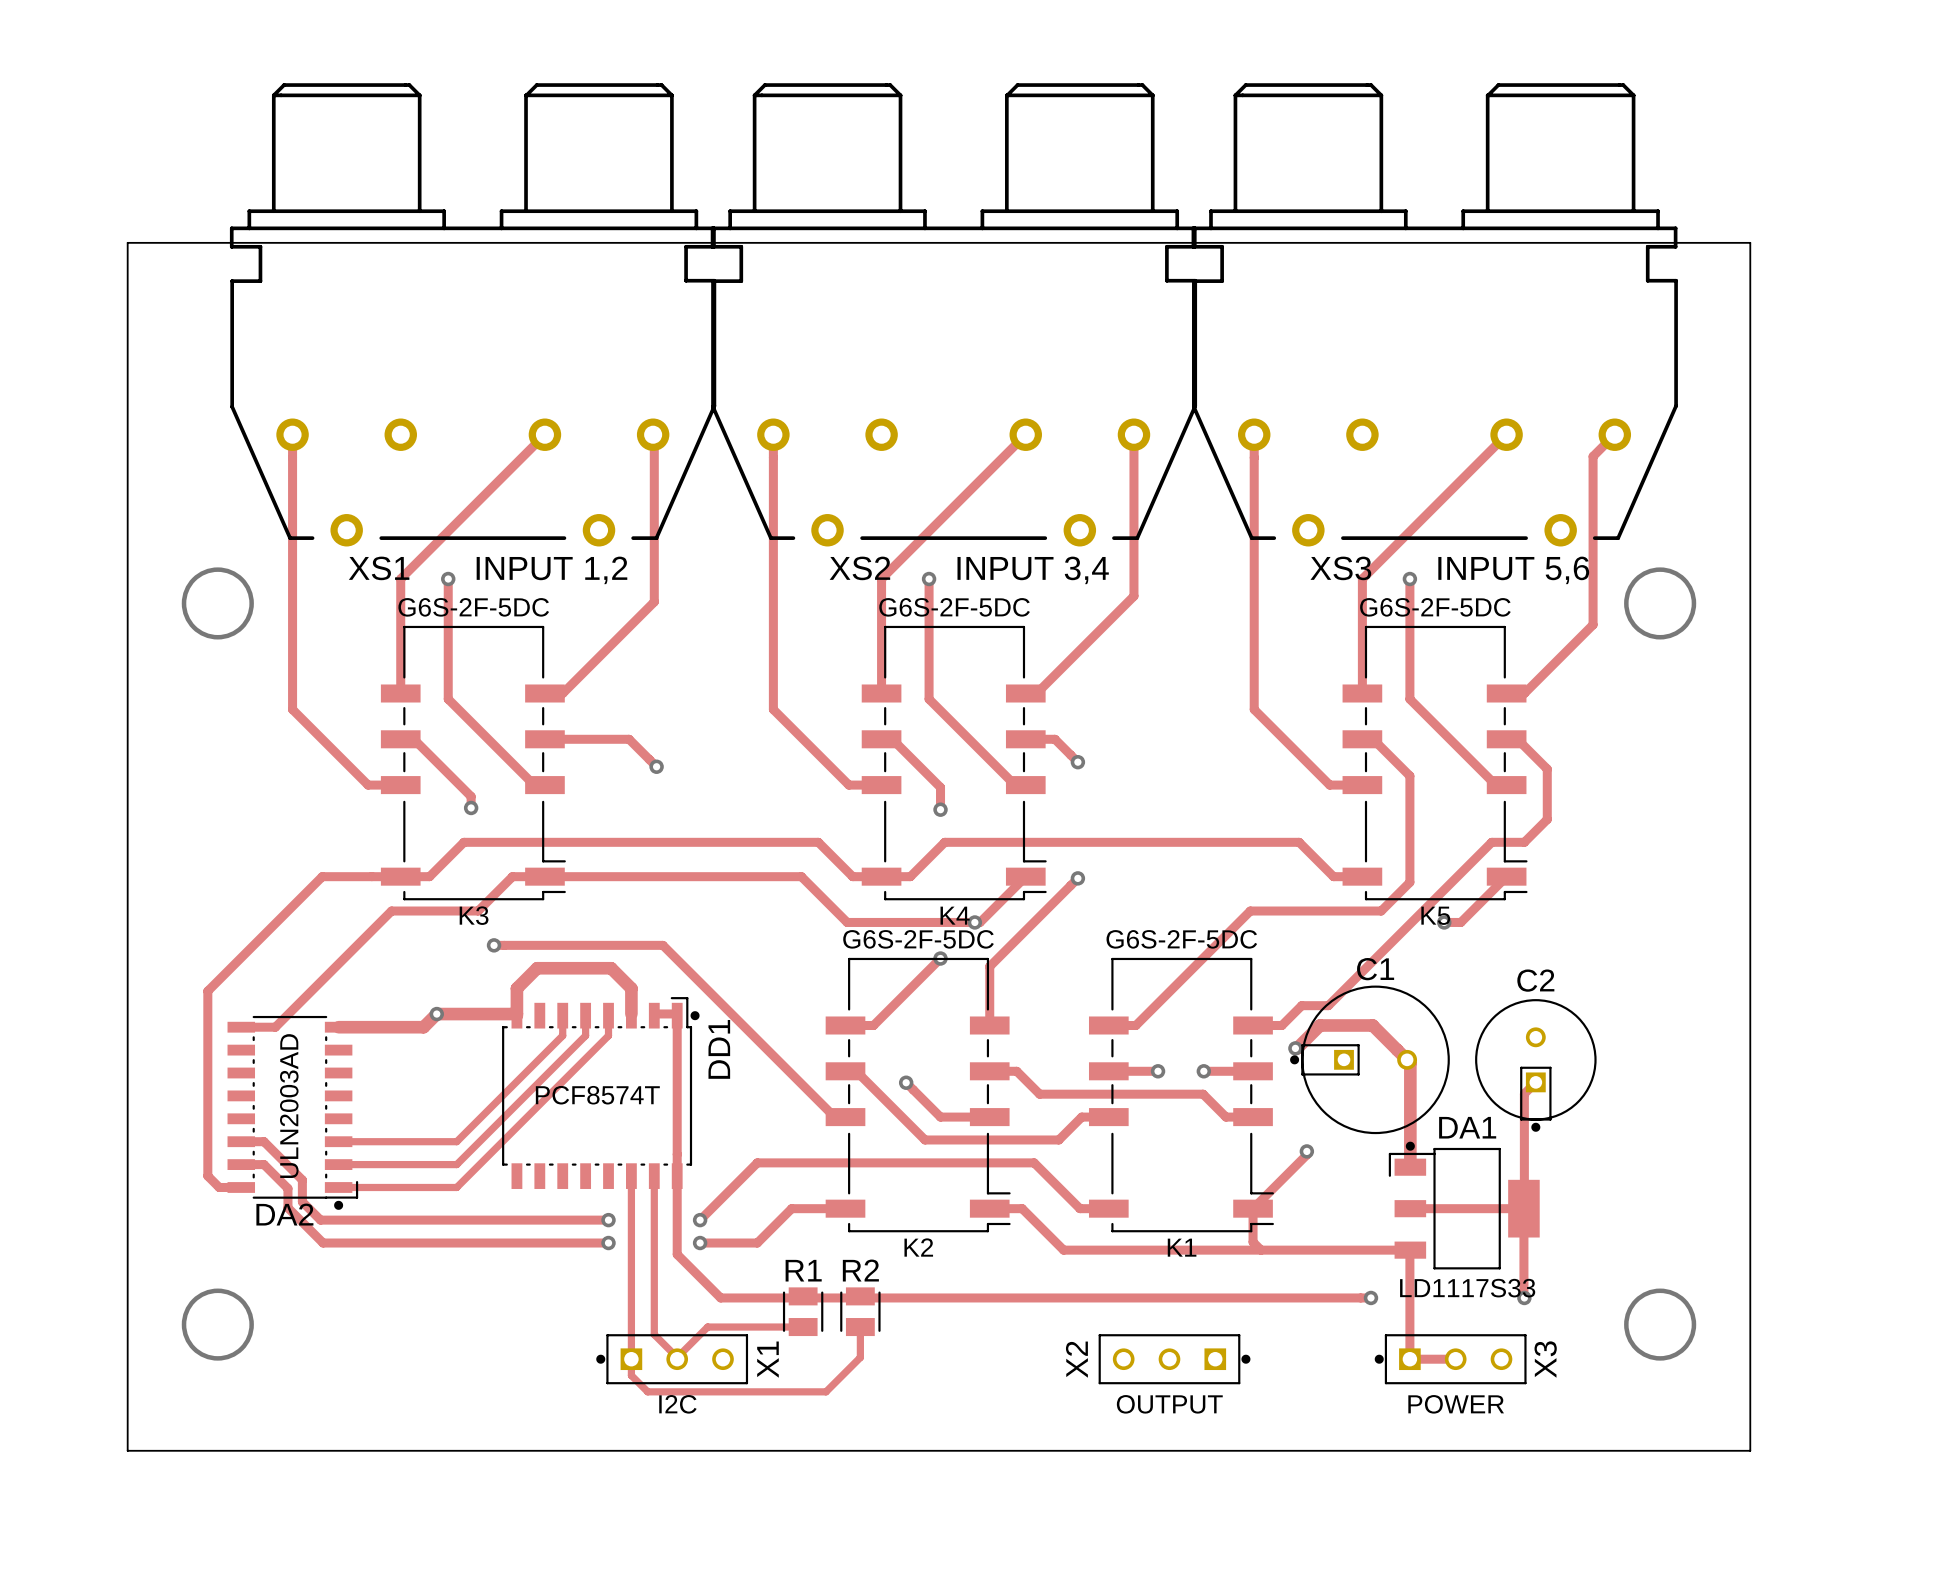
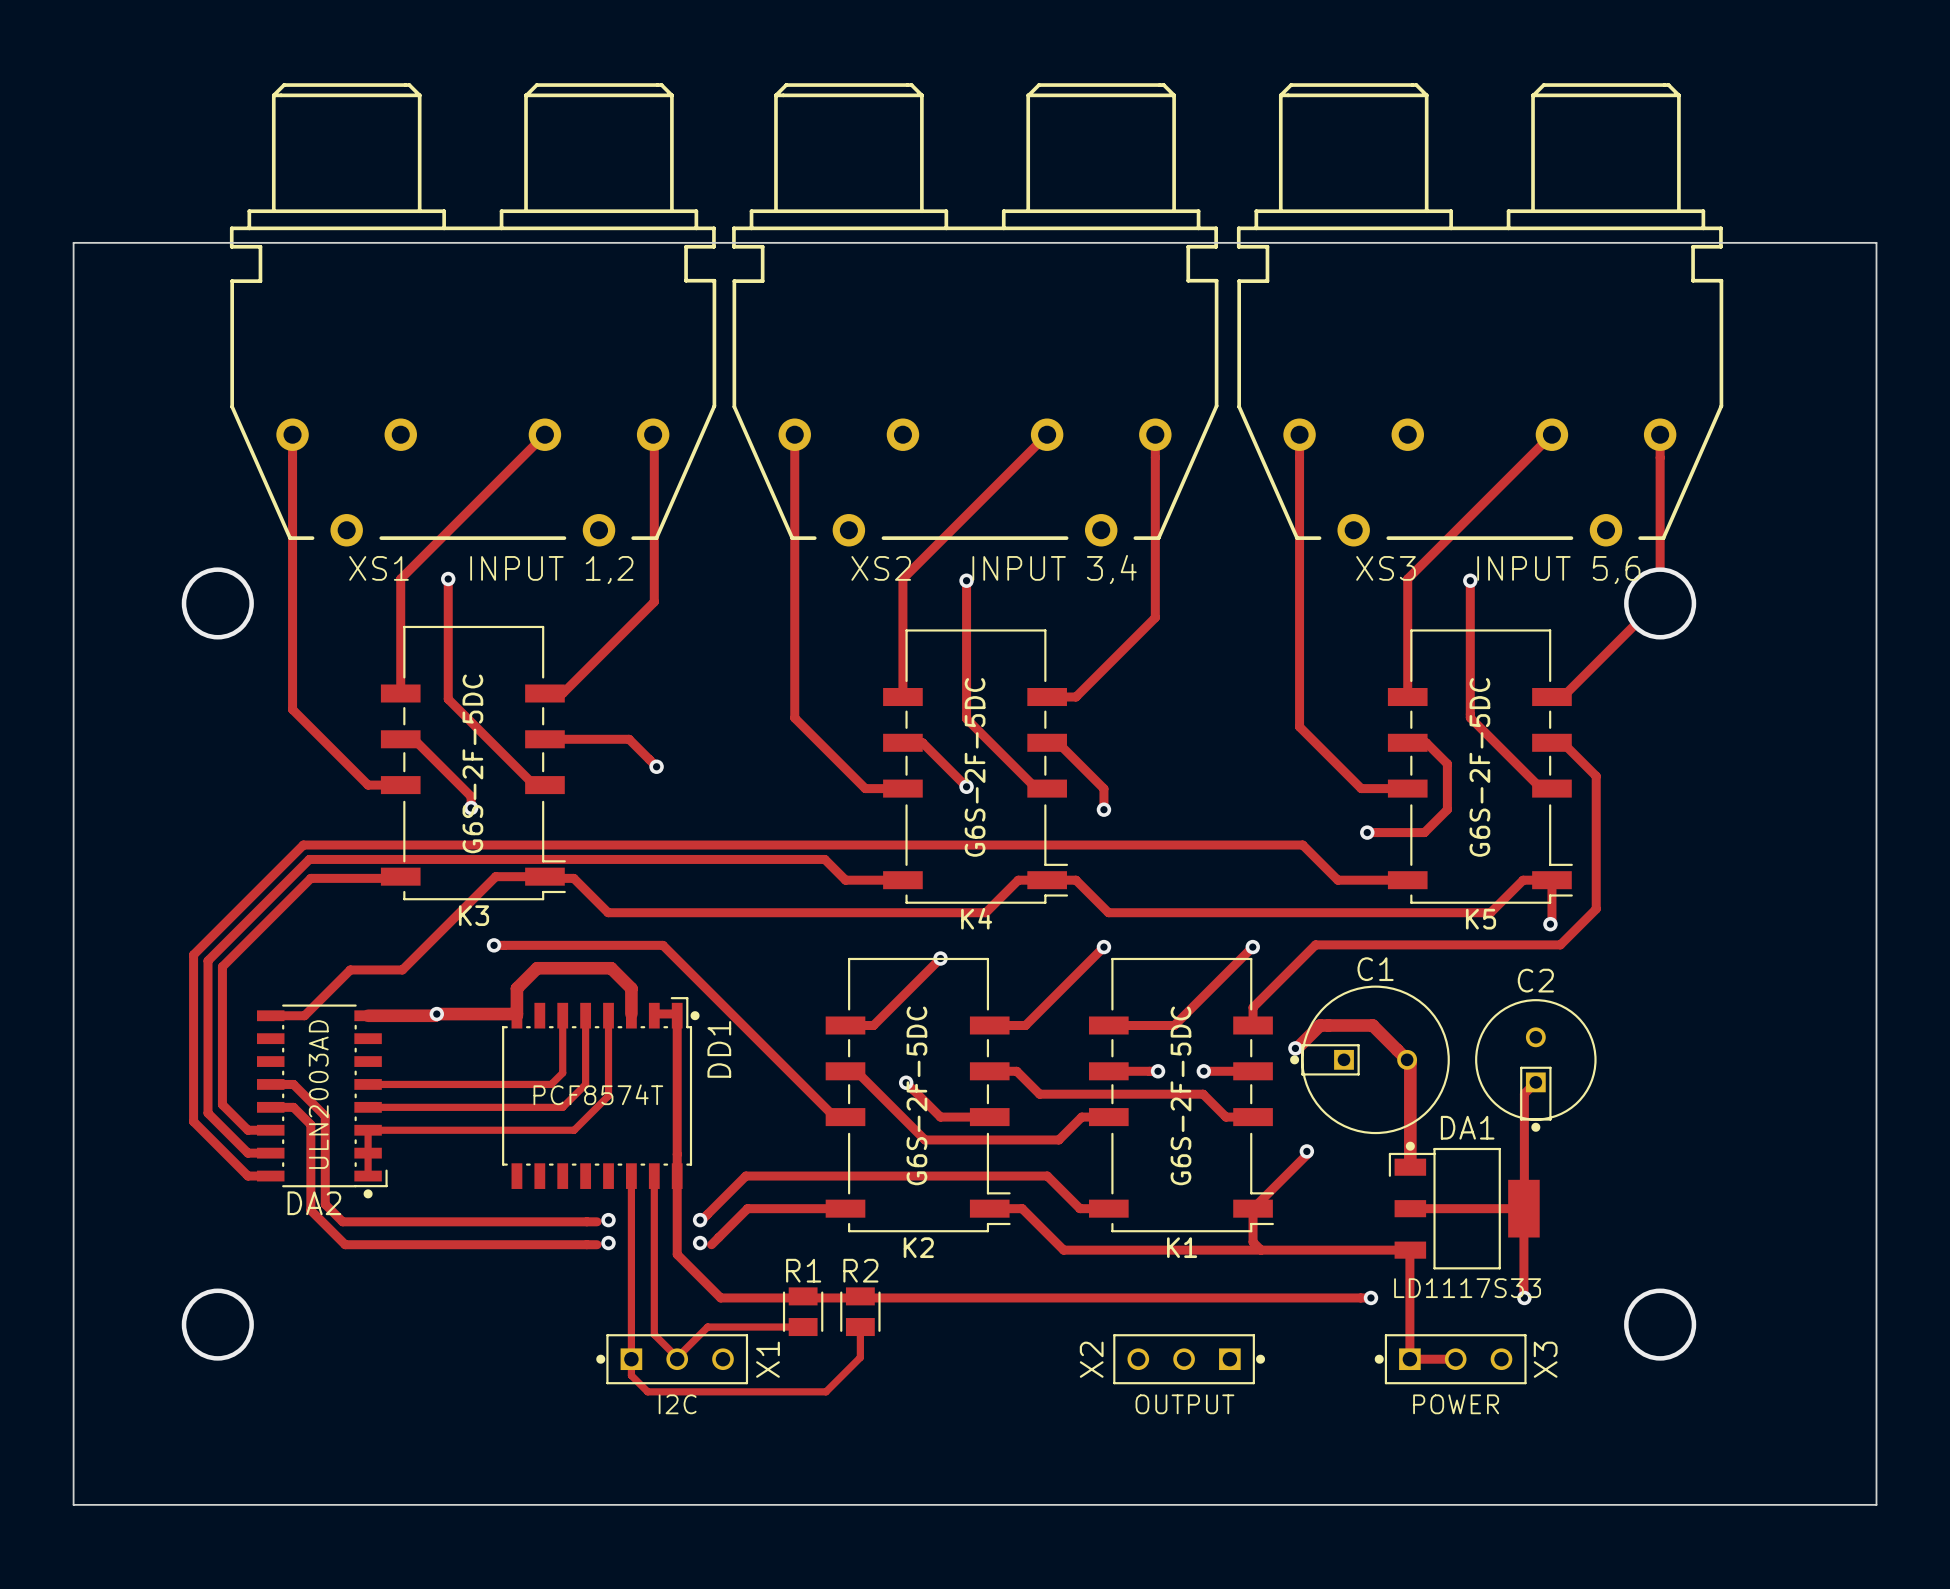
board edge: (127, 242) (127, 1450) (1750, 1450) (1750, 242) -> (127, 242) (73, 242) (73, 1504) (1876, 1504) (1876, 242) (1750, 242)
XS2 position: (953, 314) -> (975, 314)
XS3 position: (1434, 314) -> (1480, 314)
track: (773, 434) (773, 709) (848, 785) (881, 785) -> none
track: none -> (794, 434) (794, 718) (865, 788) (902, 788)
track: (1025, 434) (881, 578) (881, 693) -> none
track: none -> (1047, 434) (902, 578) (902, 697)
track: (1133, 434) (1133, 596) (1036, 693) (1025, 693) -> none
track: none -> (1155, 434) (1155, 617) (1076, 697) (1047, 697)
track: (1254, 434) (1254, 709) (1329, 785) (1362, 785) -> none
track: none -> (1299, 434) (1299, 726) (1361, 788) (1407, 788)
track: (1506, 434) (1362, 578) (1362, 693) -> none
track: none -> (1551, 434) (1407, 578) (1407, 697)
track: (1614, 434) (1593, 456) (1593, 624) (1524, 693) (1506, 693) -> none
track: none -> (1660, 434) (1660, 599) (1562, 697) (1551, 697)
track: (929, 579) (929, 699) (1014, 785) (1025, 785) -> none
via position: (929, 579) -> (966, 580)
track: (1409, 579) (1409, 699) (1495, 785) (1506, 785) -> none
via position: (1409, 579) -> (1470, 580)
track: none -> (966, 580) (966, 718) (1036, 788) (1047, 788)
track: none -> (1470, 580) (1470, 717) (1541, 788) (1551, 788)
K3 value rotation: 0° (473, 607) -> 90° counterclockwise (472, 763)
K4 value rotation: 0° (954, 607) -> 90° counterclockwise (975, 767)
K5 value rotation: 0° (1435, 607) -> 90° counterclockwise (1479, 767)
track: (881, 739) (892, 739) (940, 787) (940, 809) -> none
track: (1025, 739) (1055, 739) (1077, 762) -> none
track: (1362, 739) (1373, 739) (1409, 775) (1409, 882) (1381, 911) (1250, 911) (1135, 1025) -> (1252, 947) (1174, 1025) (1135, 1025)
track: (1506, 739) (1517, 739) (1547, 769) (1547, 819) (1524, 842) (1491, 842) (1328, 1005) (1301, 1005) (1281, 1025) (1253, 1025) -> (1551, 742) (1562, 742) (1596, 776) (1596, 909) (1560, 944) (1315, 944) (1253, 1007) (1253, 1025)
track: none -> (902, 742) (922, 742) (966, 786)
track: none -> (1047, 742) (1057, 742) (1103, 788) (1103, 809)
track: none -> (1407, 742) (1426, 742) (1447, 763) (1447, 809) (1424, 832) (1367, 832)
via: (1077, 762) -> none
K4 position: (954, 763) -> (975, 766)
K5 position: (1435, 763) -> (1480, 766)
via position: (940, 809) -> (966, 786)
via: none -> (1103, 809)
via: none -> (1367, 832)
track: (512, 876) (478, 911) (391, 911) (275, 1027) (241, 1027) -> (512, 876) (495, 876) (402, 969) (350, 969) (304, 1015) (270, 1015)
track: (544, 876) (801, 876) (847, 922) (980, 922) (1025, 876) -> none
track: (1362, 876) (1333, 876) (1299, 842) (944, 842) (910, 876) (852, 876) (818, 842) (463, 842) (429, 876) (322, 876) (207, 991) (207, 1176) (219, 1187) (249, 1187) -> none
track: (1506, 876) (1460, 922) (1444, 922) -> none
track: none -> (400, 878) (310, 878) (222, 966) (222, 1104) (247, 1130) (270, 1130)
track: none -> (544, 878) (573, 878) (608, 912) (985, 912) (1018, 880) (1076, 880) (1108, 912) (1490, 912) (1523, 880) (1551, 880) (1550, 924)
track: (1077, 878) (989, 966) (989, 1025) -> (1103, 947) (1025, 1025) (989, 1025)
via: (1077, 878) -> none
track: none -> (902, 880) (845, 880) (824, 859) (309, 859) (208, 960) (208, 1113) (247, 1153) (270, 1153)
track: none -> (1407, 880) (1337, 880) (1302, 845) (303, 845) (193, 954) (193, 1121) (247, 1176) (270, 1176)
via: (974, 922) -> none
via: (1444, 922) -> none
via: none -> (1550, 924)
K2 value rotation: 0° (918, 939) -> 90° counterclockwise (916, 1095)
K1 value rotation: 0° (1181, 939) -> 90° counterclockwise (1180, 1095)
via: none -> (1103, 947)
via: none -> (1252, 947)
track: (435, 1015) (423, 1027) (338, 1027) -> (435, 1015) (368, 1015)
track: (562, 1035) (456, 1141) (338, 1141) -> (562, 1035) (562, 1073) (551, 1084) (368, 1084)
track: (585, 1035) (456, 1164) (338, 1164) -> (585, 1035) (585, 1084) (562, 1107) (368, 1107)
track: (608, 1035) (456, 1187) (338, 1187) -> (608, 1035) (608, 1095) (574, 1130) (368, 1130) (368, 1176)
track: none -> (270, 1084) (293, 1084) (325, 1116) (325, 1204) (342, 1221) (597, 1221)
DA2 position: (292, 1112) -> (322, 1101)
track: (241, 1141) (264, 1141) (302, 1180) (302, 1201) (310, 1210) -> (270, 1107) (293, 1107) (310, 1124) (310, 1210)
track: (241, 1164) (264, 1164) (287, 1188) (287, 1207) (323, 1243) (608, 1243) -> none
track: (1047, 1176) (1034, 1162) (757, 1162) (700, 1220) -> (1047, 1176) (745, 1176) (700, 1221)
track: (791, 1208) (757, 1243) (700, 1243) -> (791, 1208) (747, 1208) (711, 1244)
track: (320, 1220) (608, 1220) -> (320, 1220) (345, 1244) (597, 1244)
X2 position: (1174, 1359) -> (1189, 1359)

